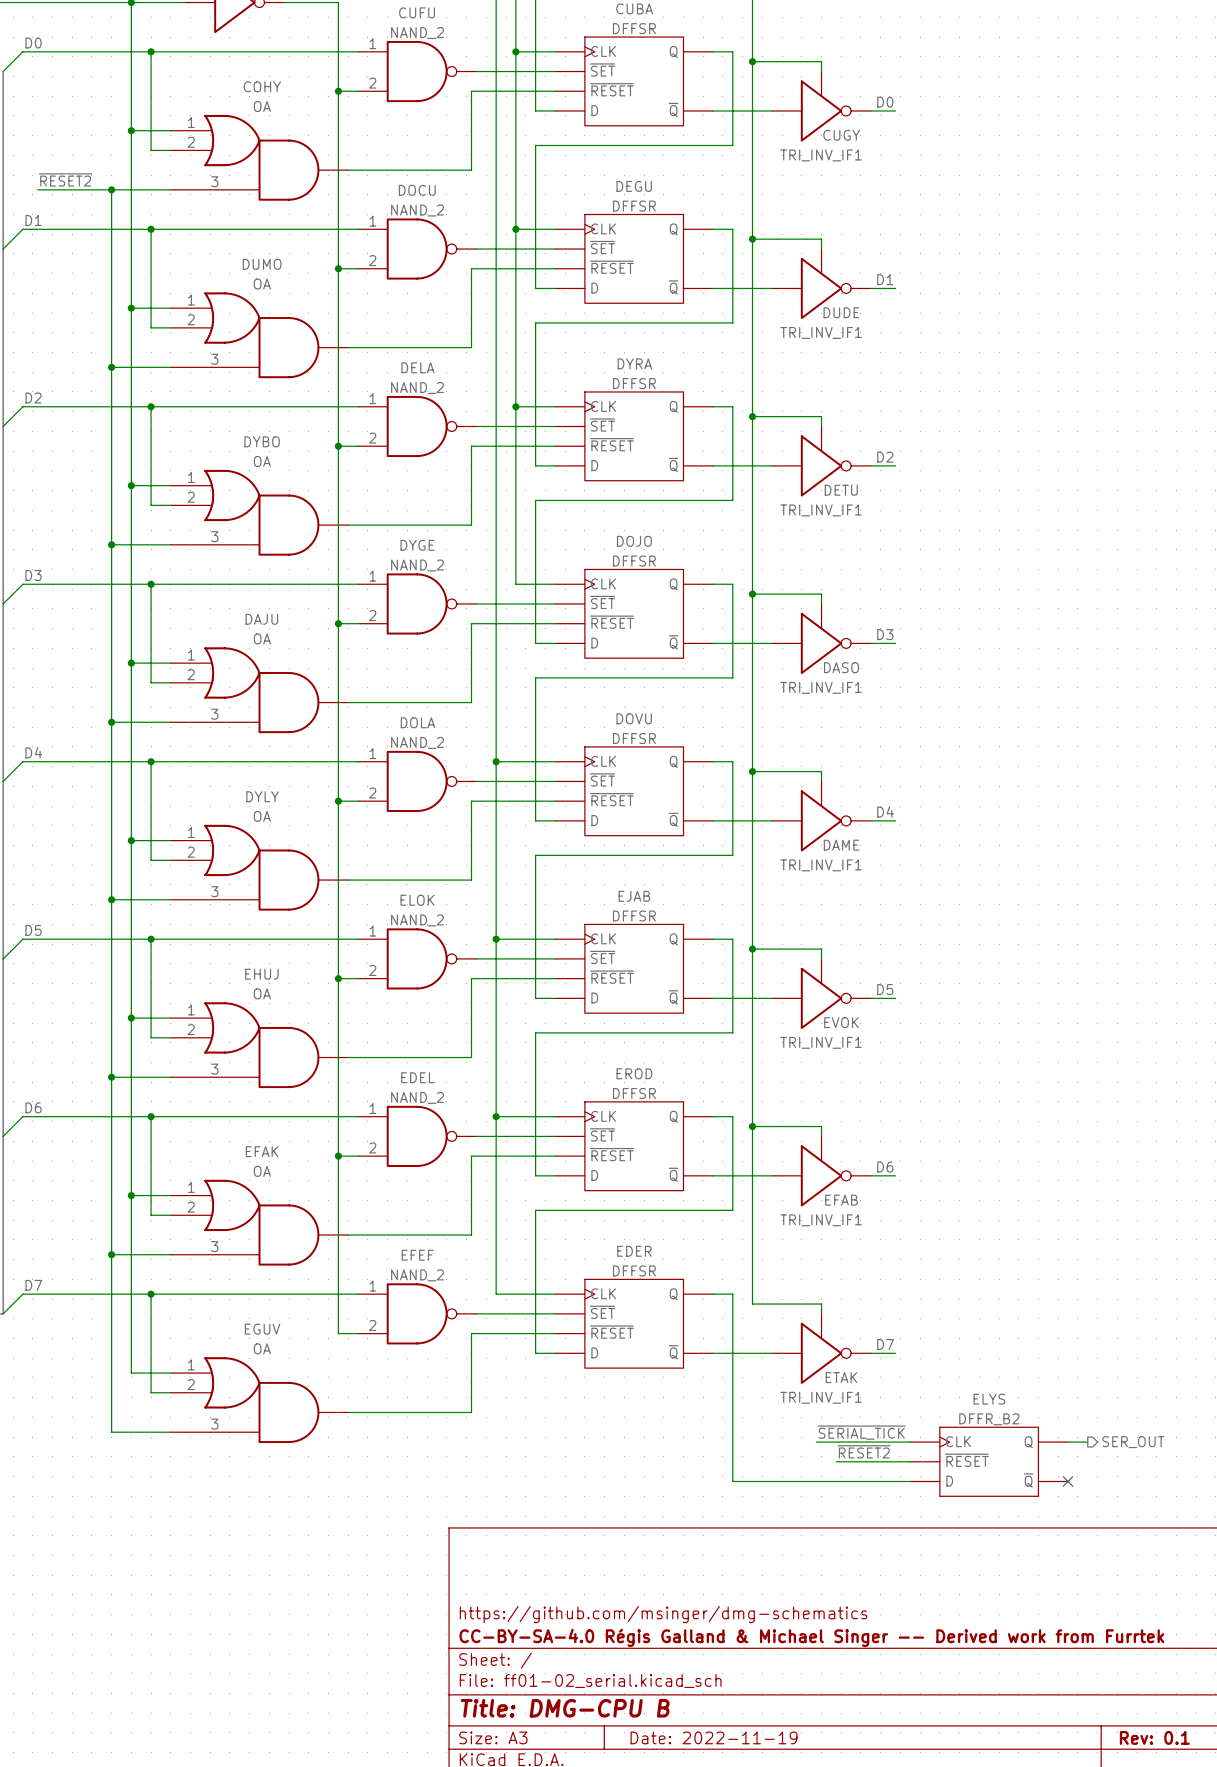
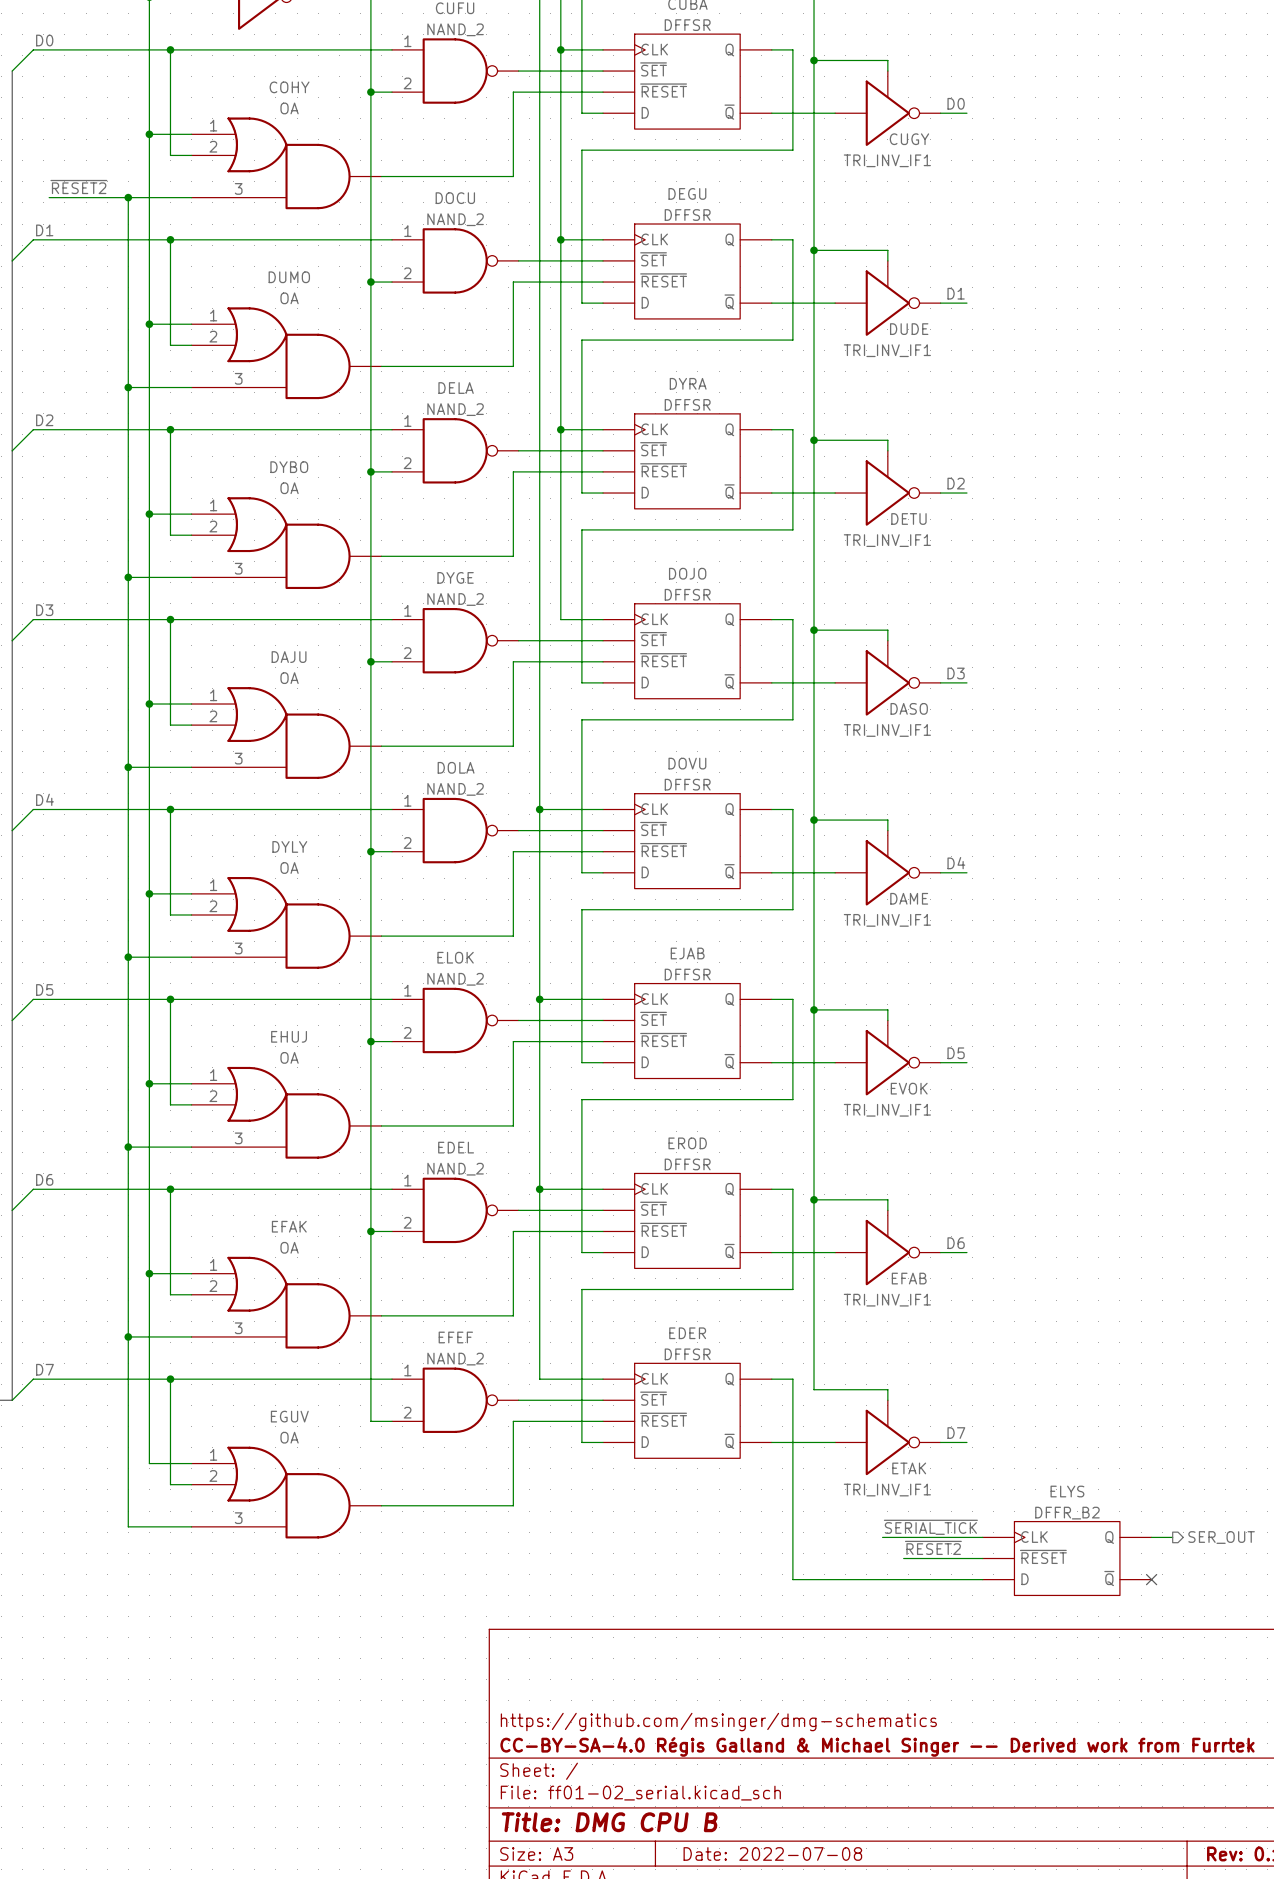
title block: Title: DMG-CPU B (565, 1708) -> Title: DMG CPU B (609, 1822)
title block: Date: 2022-11-19 (714, 1737) -> Date: 2022-07-08 (772, 1853)

